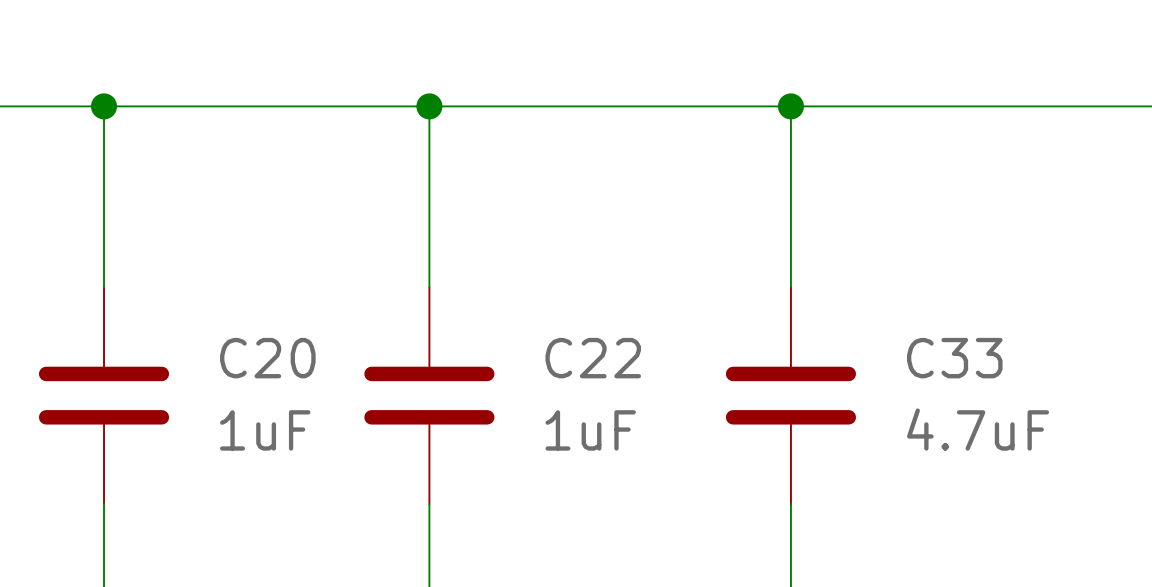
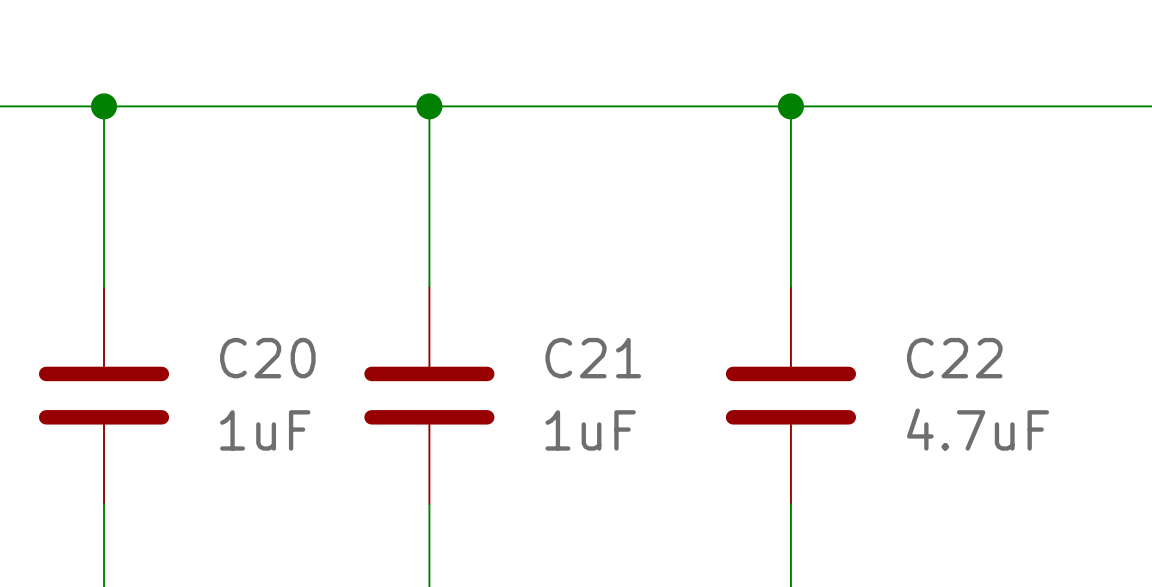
C22 name: C22 (593, 358) -> C21 (593, 358)
C33 name: C33 (954, 358) -> C22 (954, 358)

